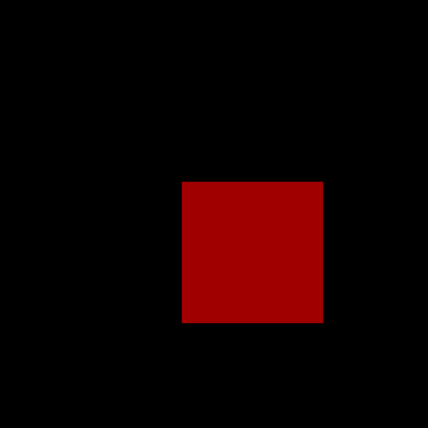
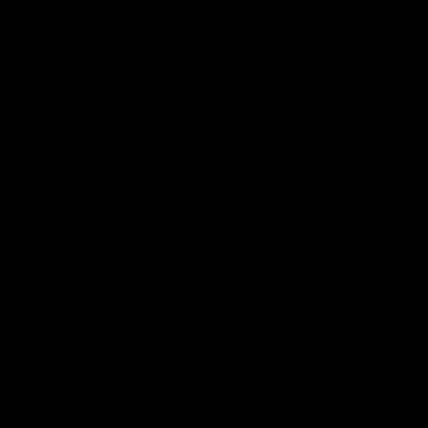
part: (252, 252) -> none

